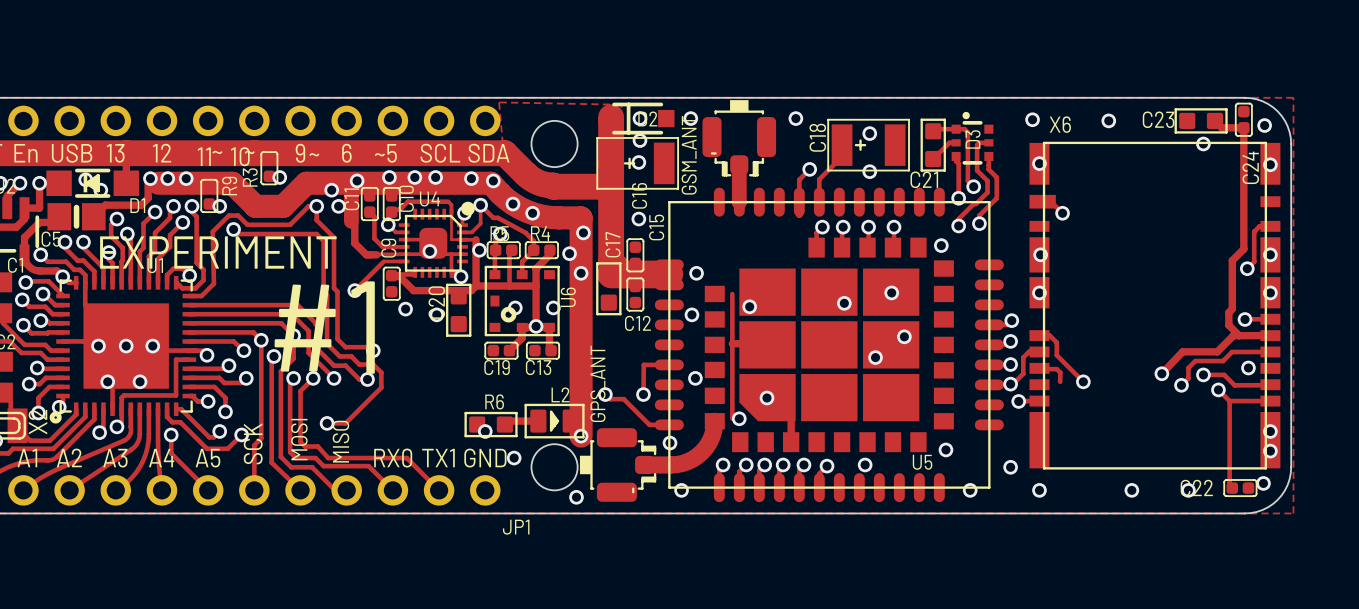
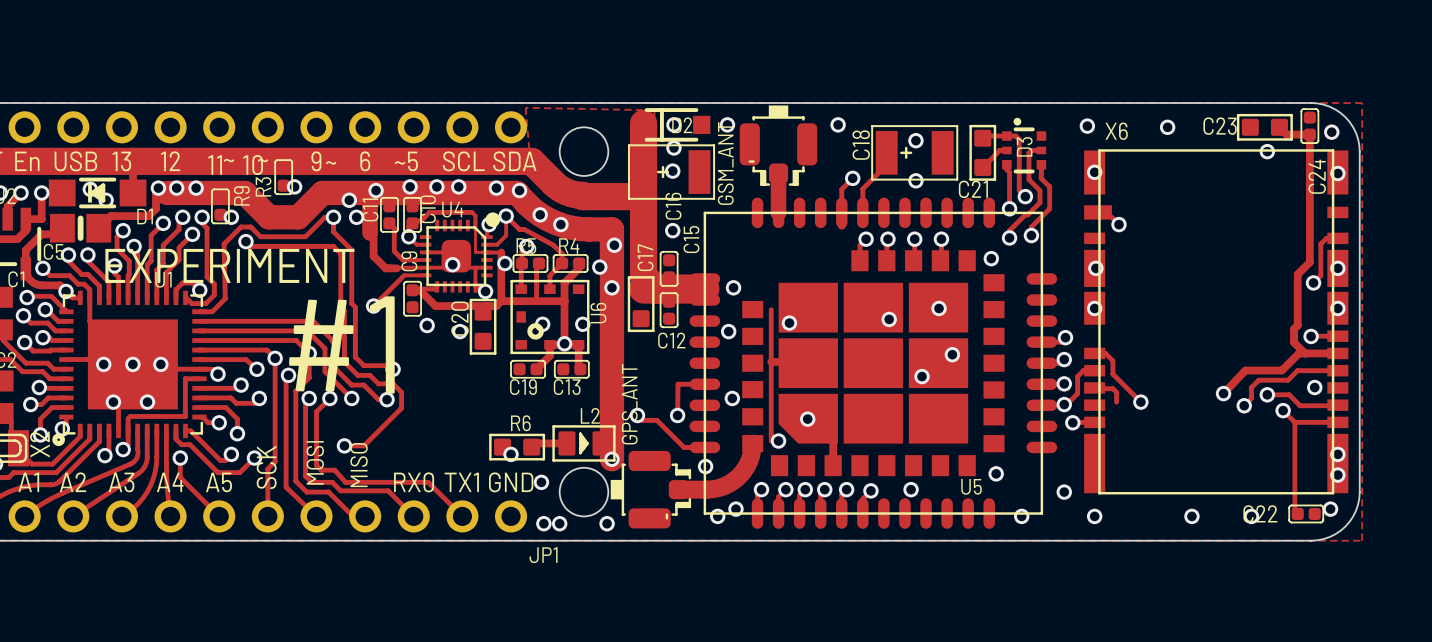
via: none -> (735, 509)
via: none -> (543, 523)
via: none -> (559, 523)

